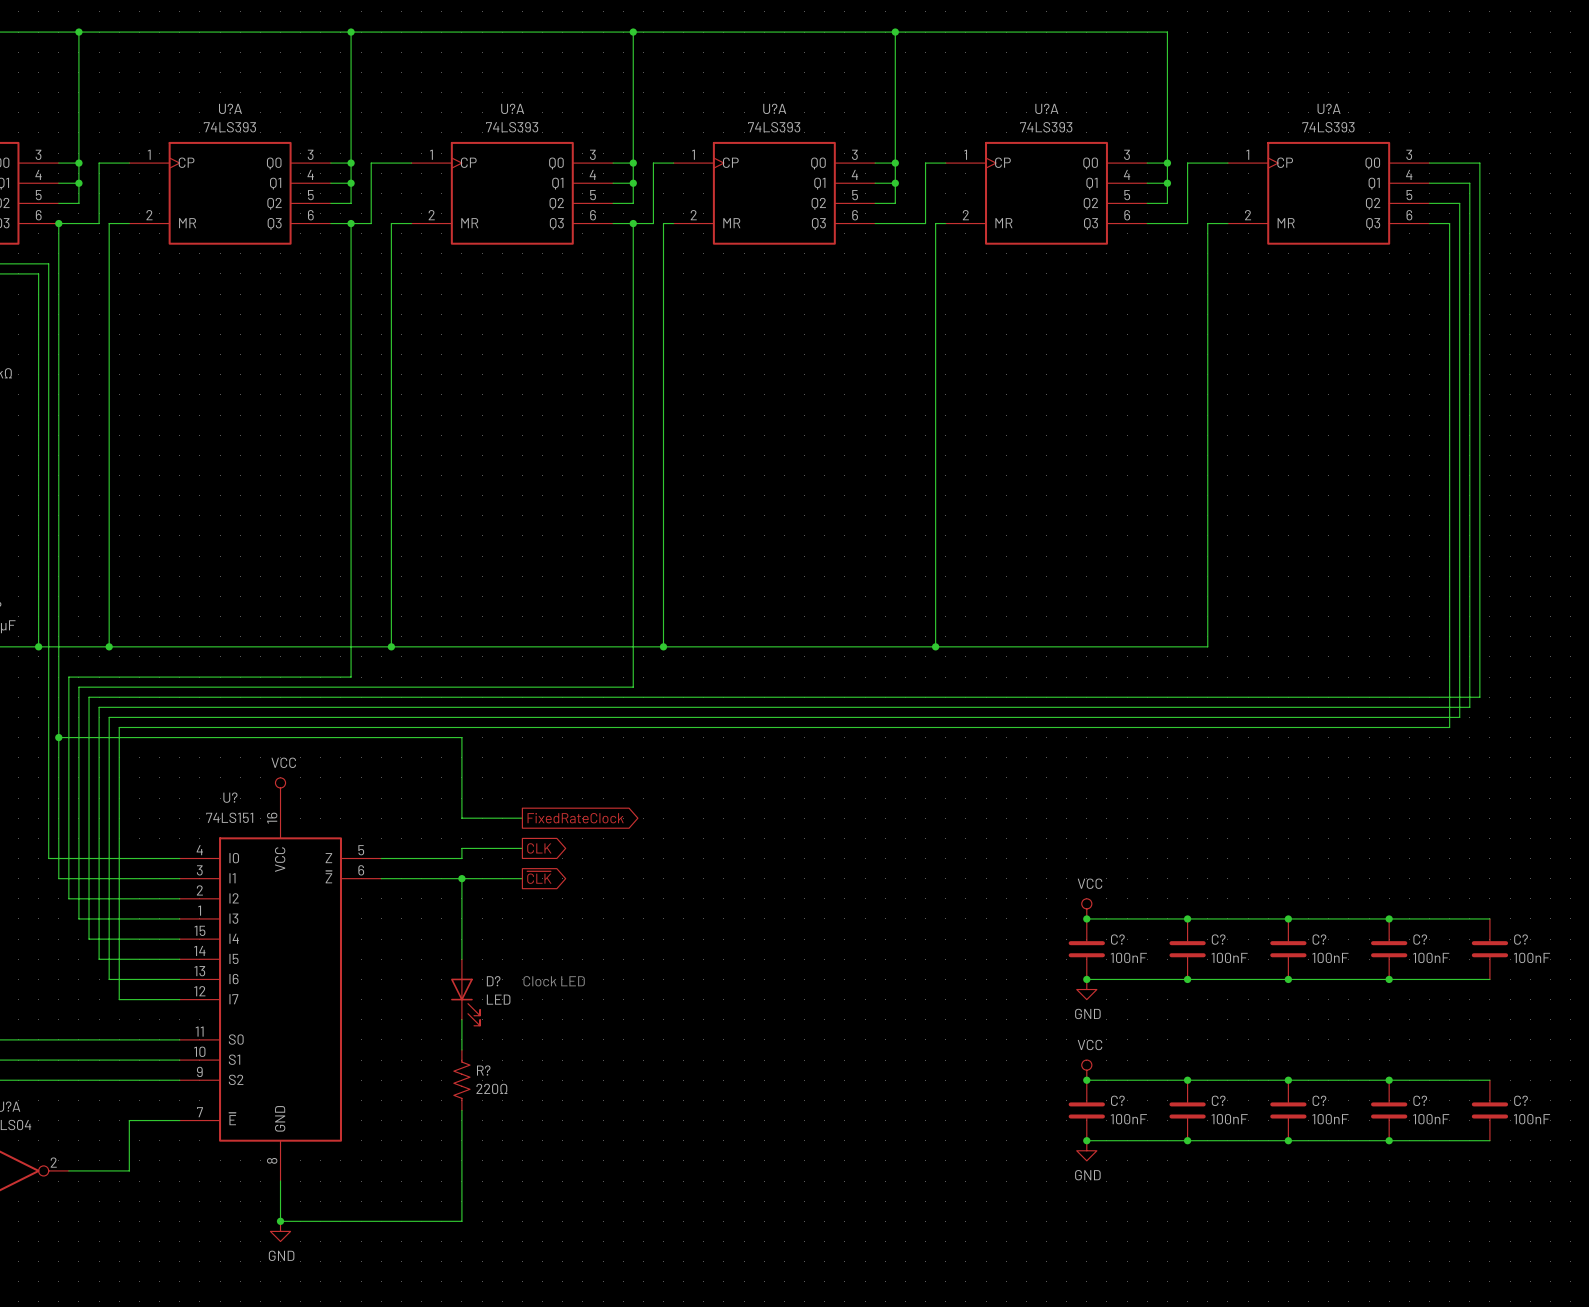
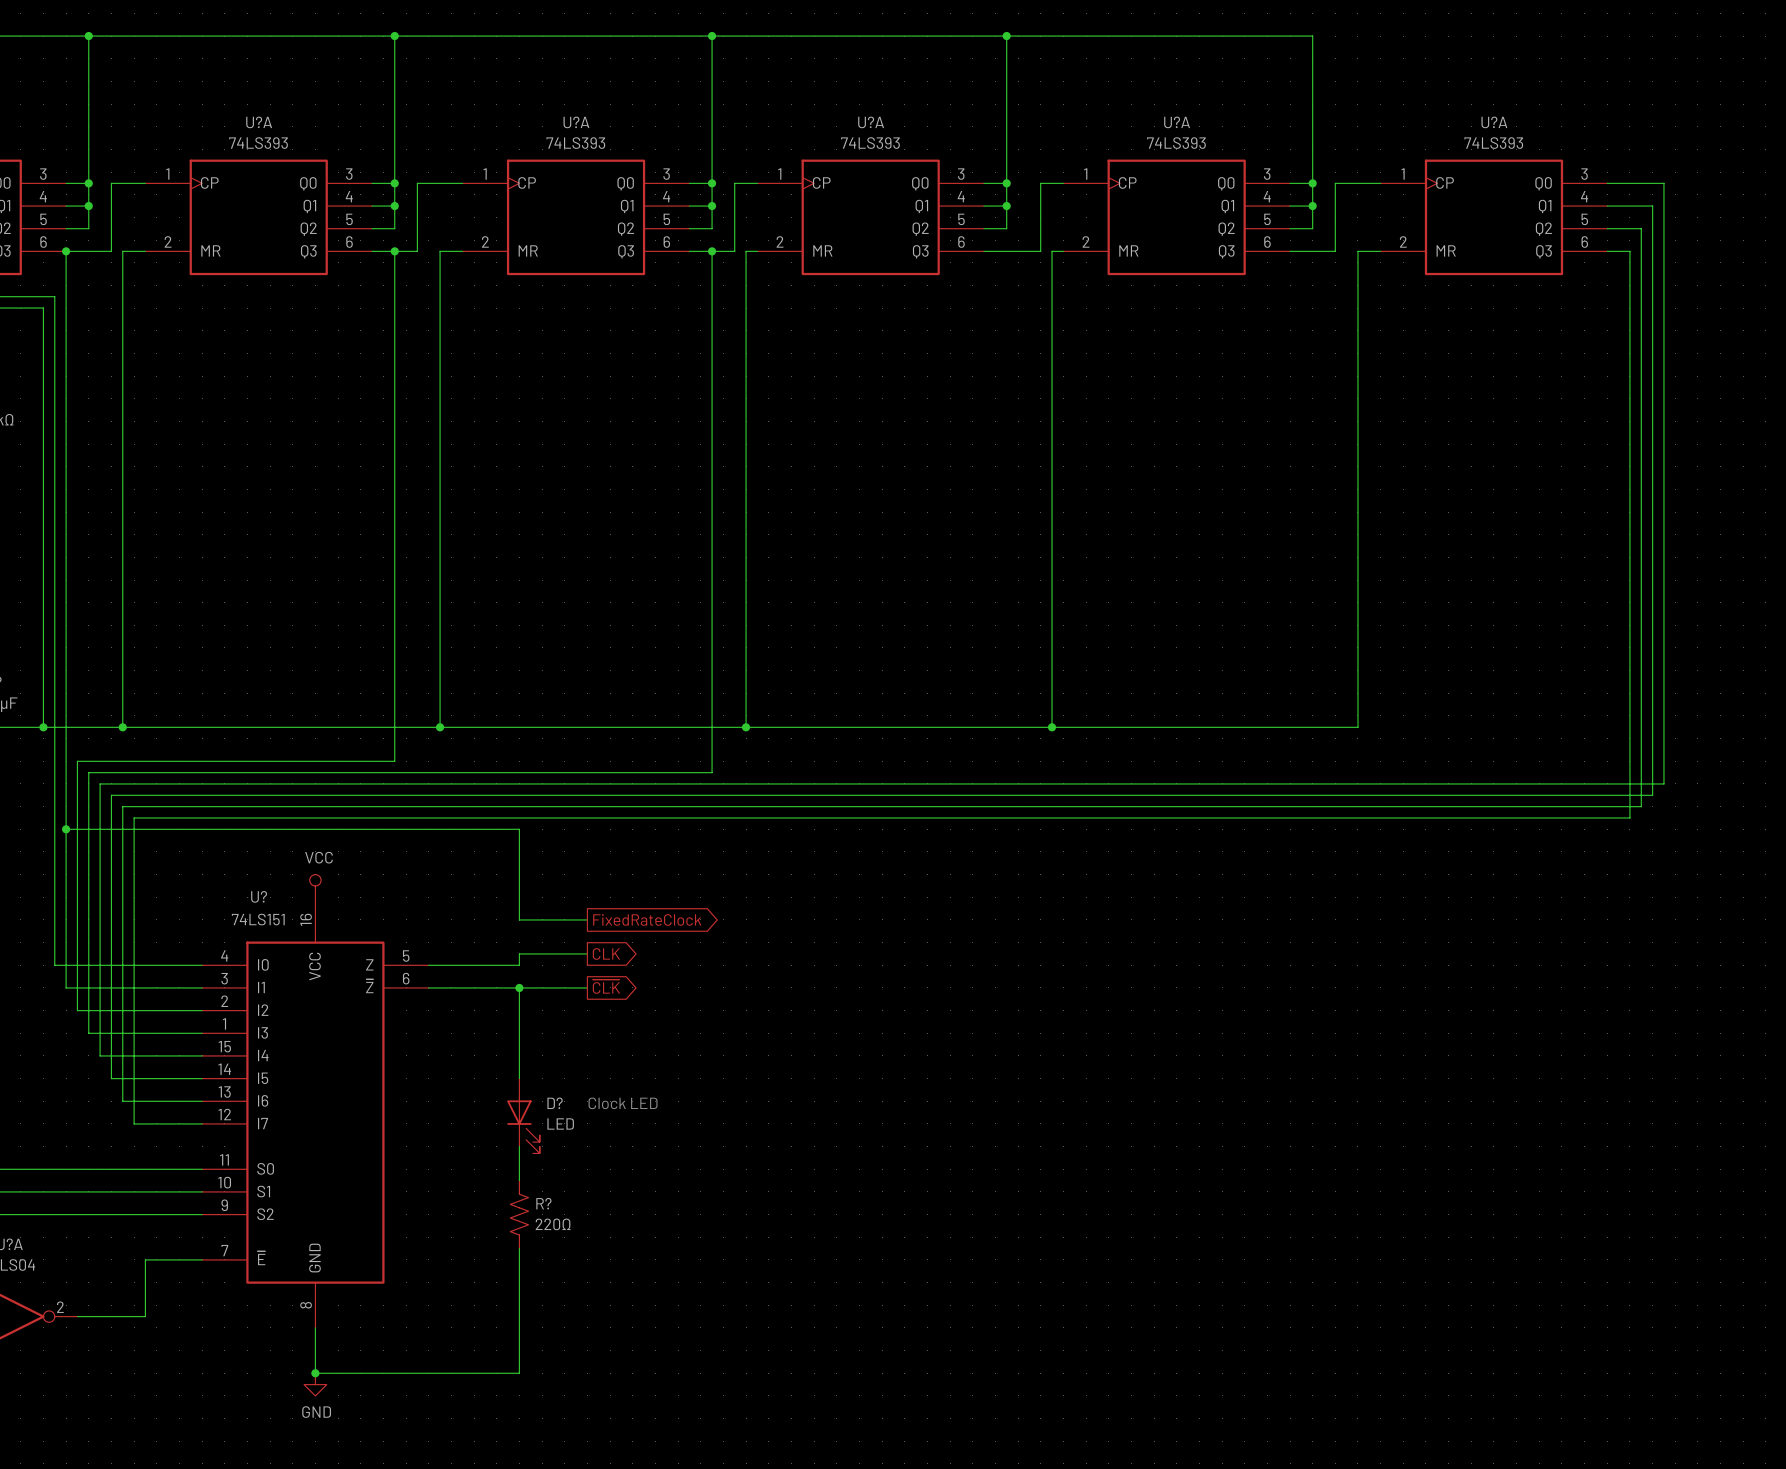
power symbol: VCC (1086, 908) -> none
wire: (1086, 918) (1489, 918) -> none
junction: (1086, 918) -> none
junction: (1187, 918) -> none
junction: (1288, 918) -> none
junction: (1389, 918) -> none
C?: 100nF (1086, 949) -> none
C?: 100nF (1187, 949) -> none
C?: 100nF (1288, 949) -> none
C?: 100nF (1389, 949) -> none
C?: 100nF (1489, 949) -> none
wire: (1086, 979) (1489, 979) -> none
junction: (1086, 979) -> none
junction: (1187, 979) -> none
junction: (1288, 979) -> none
junction: (1389, 979) -> none
power symbol: GND (1086, 989) -> none
power symbol: VCC (1086, 1070) -> none
wire: (1086, 1080) (1489, 1080) -> none
junction: (1086, 1080) -> none
junction: (1187, 1080) -> none
junction: (1288, 1080) -> none
junction: (1389, 1080) -> none
C?: 100nF (1086, 1110) -> none
C?: 100nF (1187, 1110) -> none
C?: 100nF (1288, 1110) -> none
C?: 100nF (1389, 1110) -> none
C?: 100nF (1489, 1110) -> none
wire: (1086, 1140) (1489, 1140) -> none
junction: (1086, 1140) -> none
junction: (1187, 1140) -> none
junction: (1288, 1140) -> none
junction: (1389, 1140) -> none
power symbol: GND (1086, 1150) -> none

